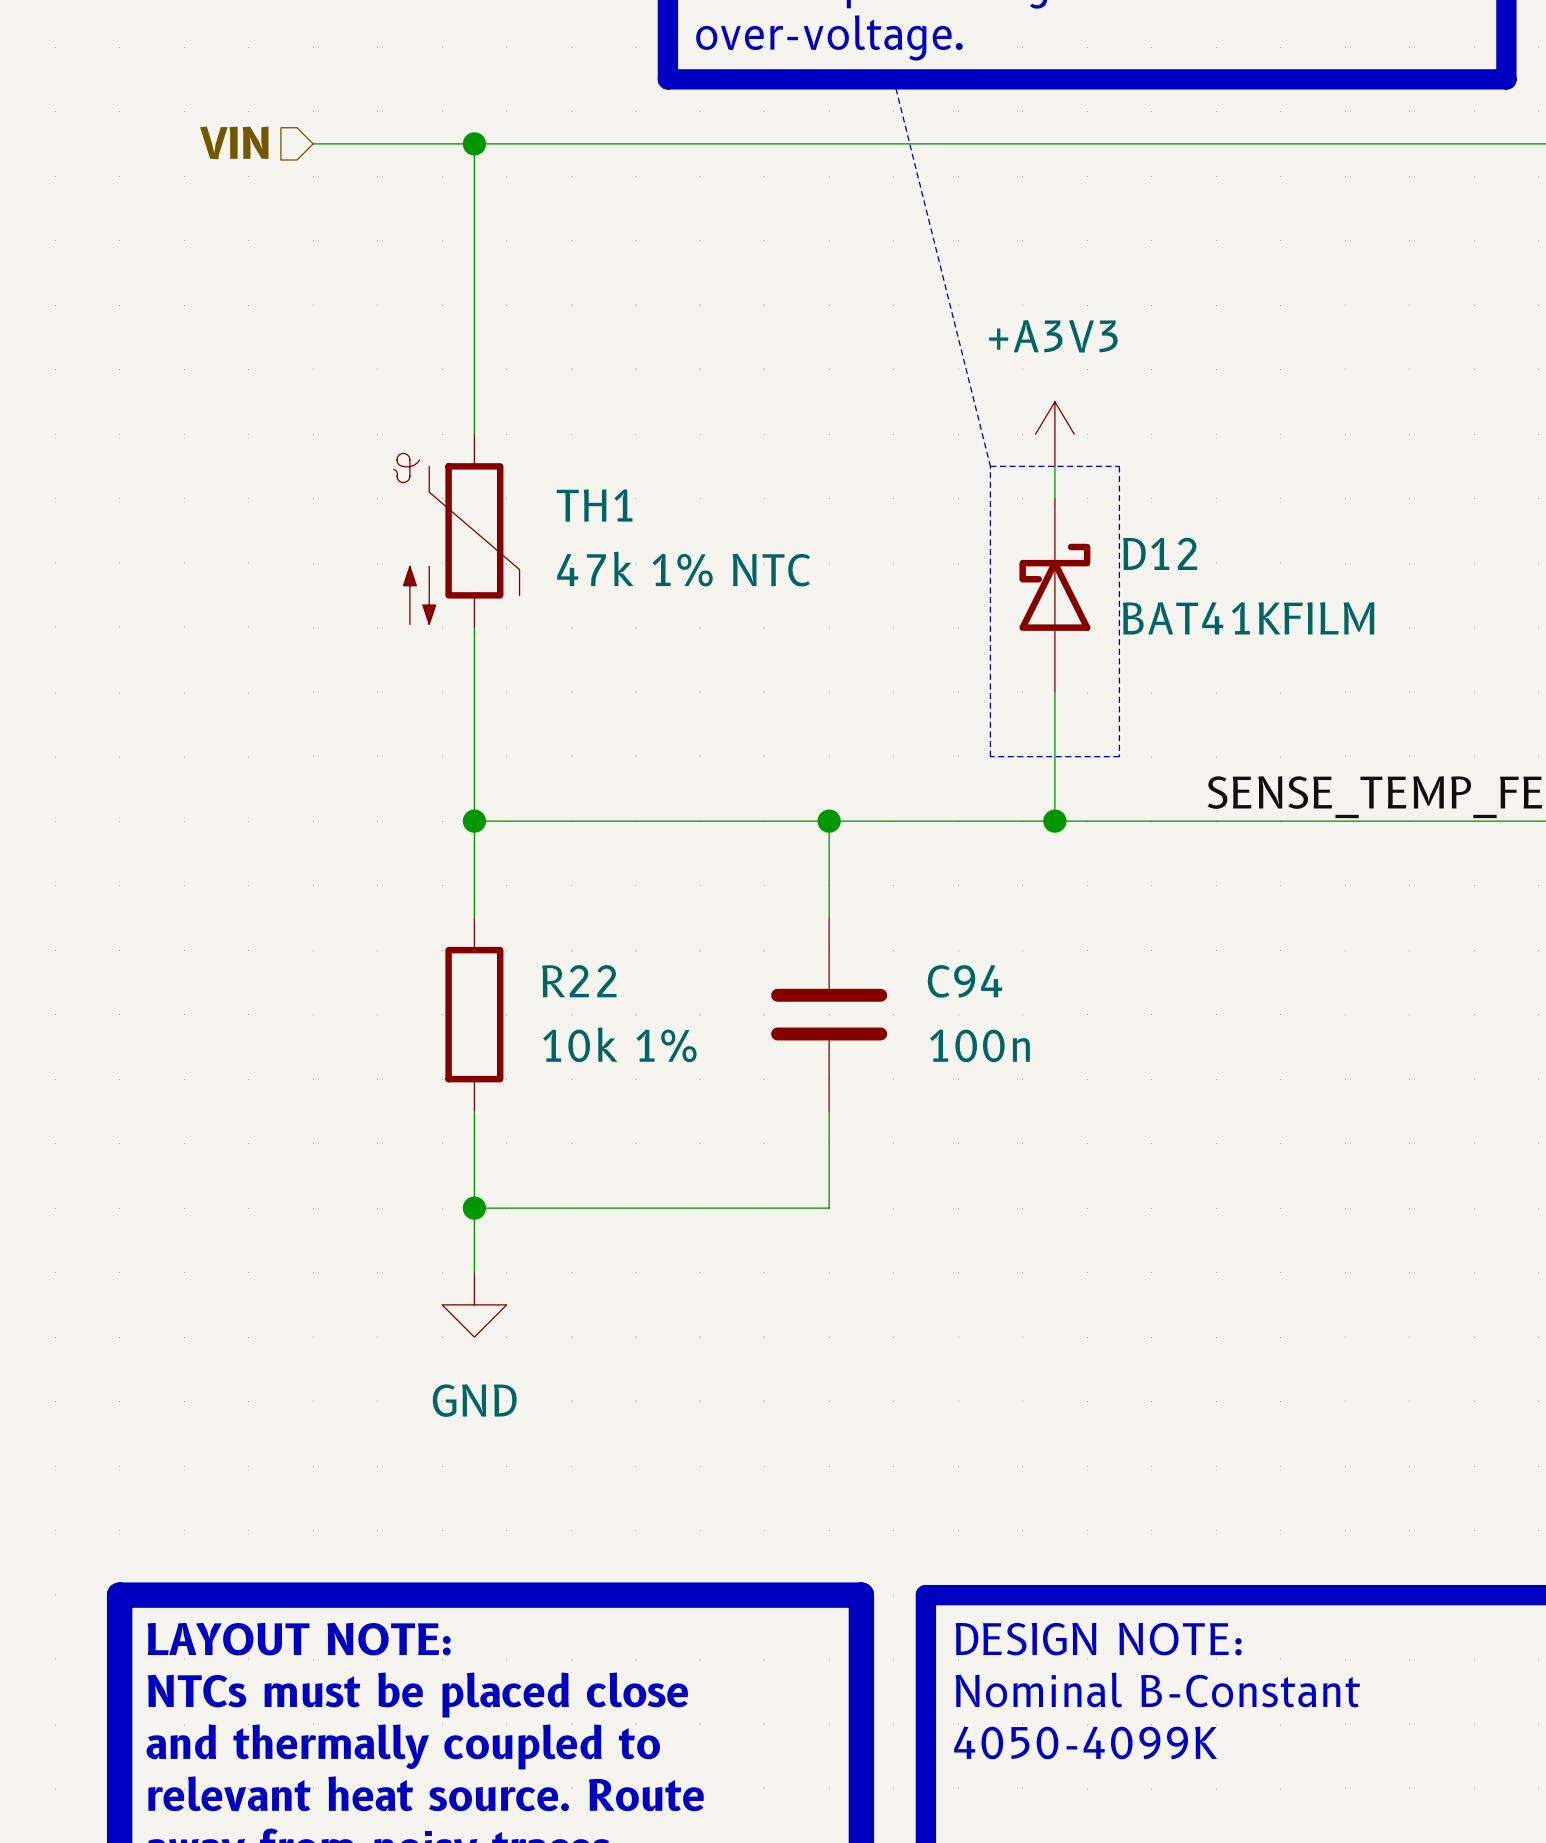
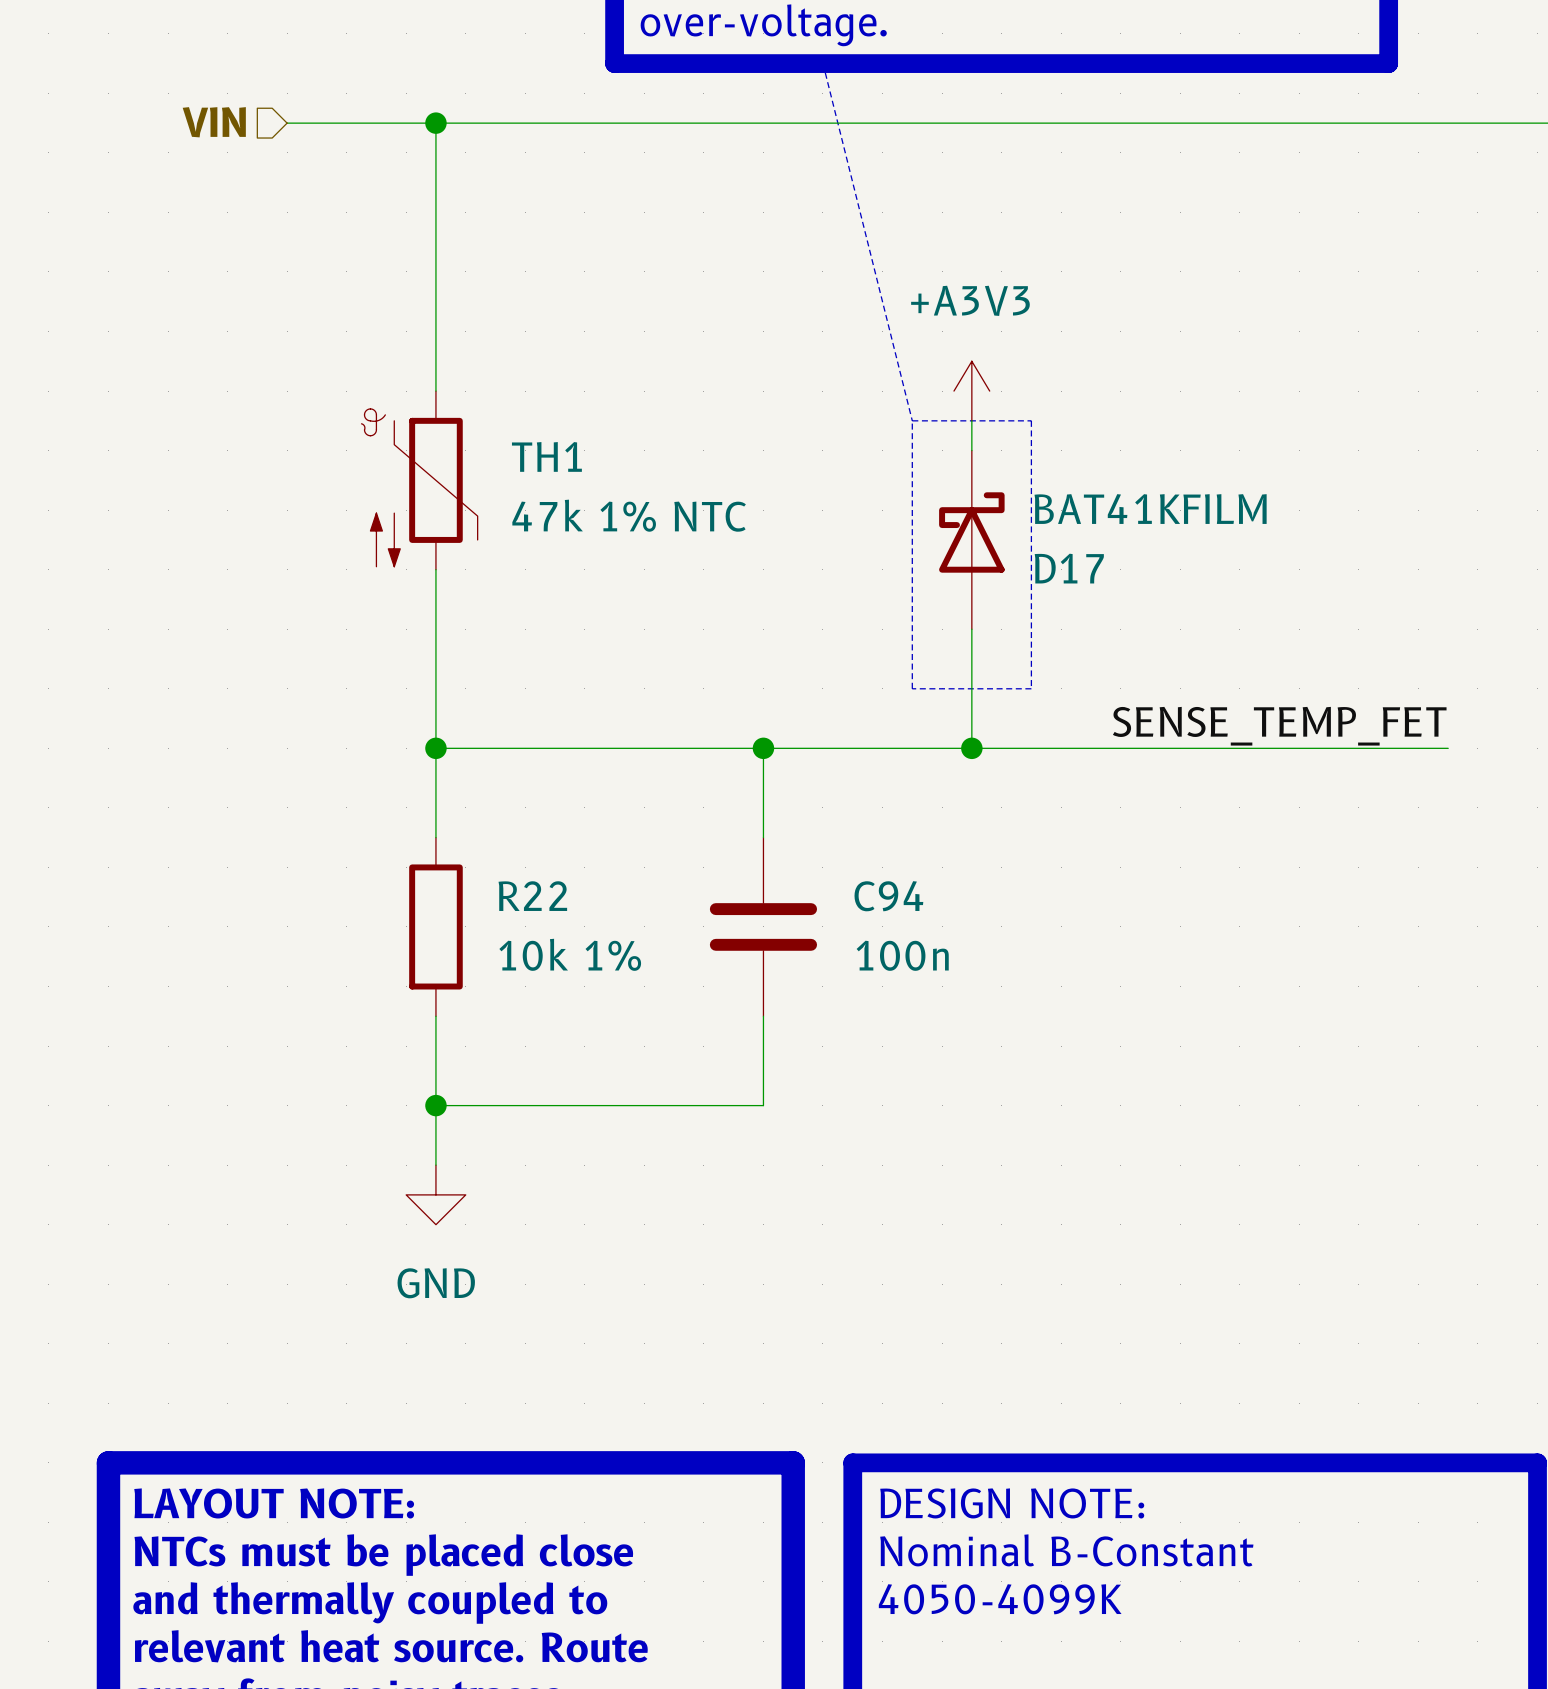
D12 name: D12 (1159, 553) -> D17 (1069, 568)
D12 value position: BAT41KFILM (1248, 618) -> BAT41KFILM (1150, 509)

